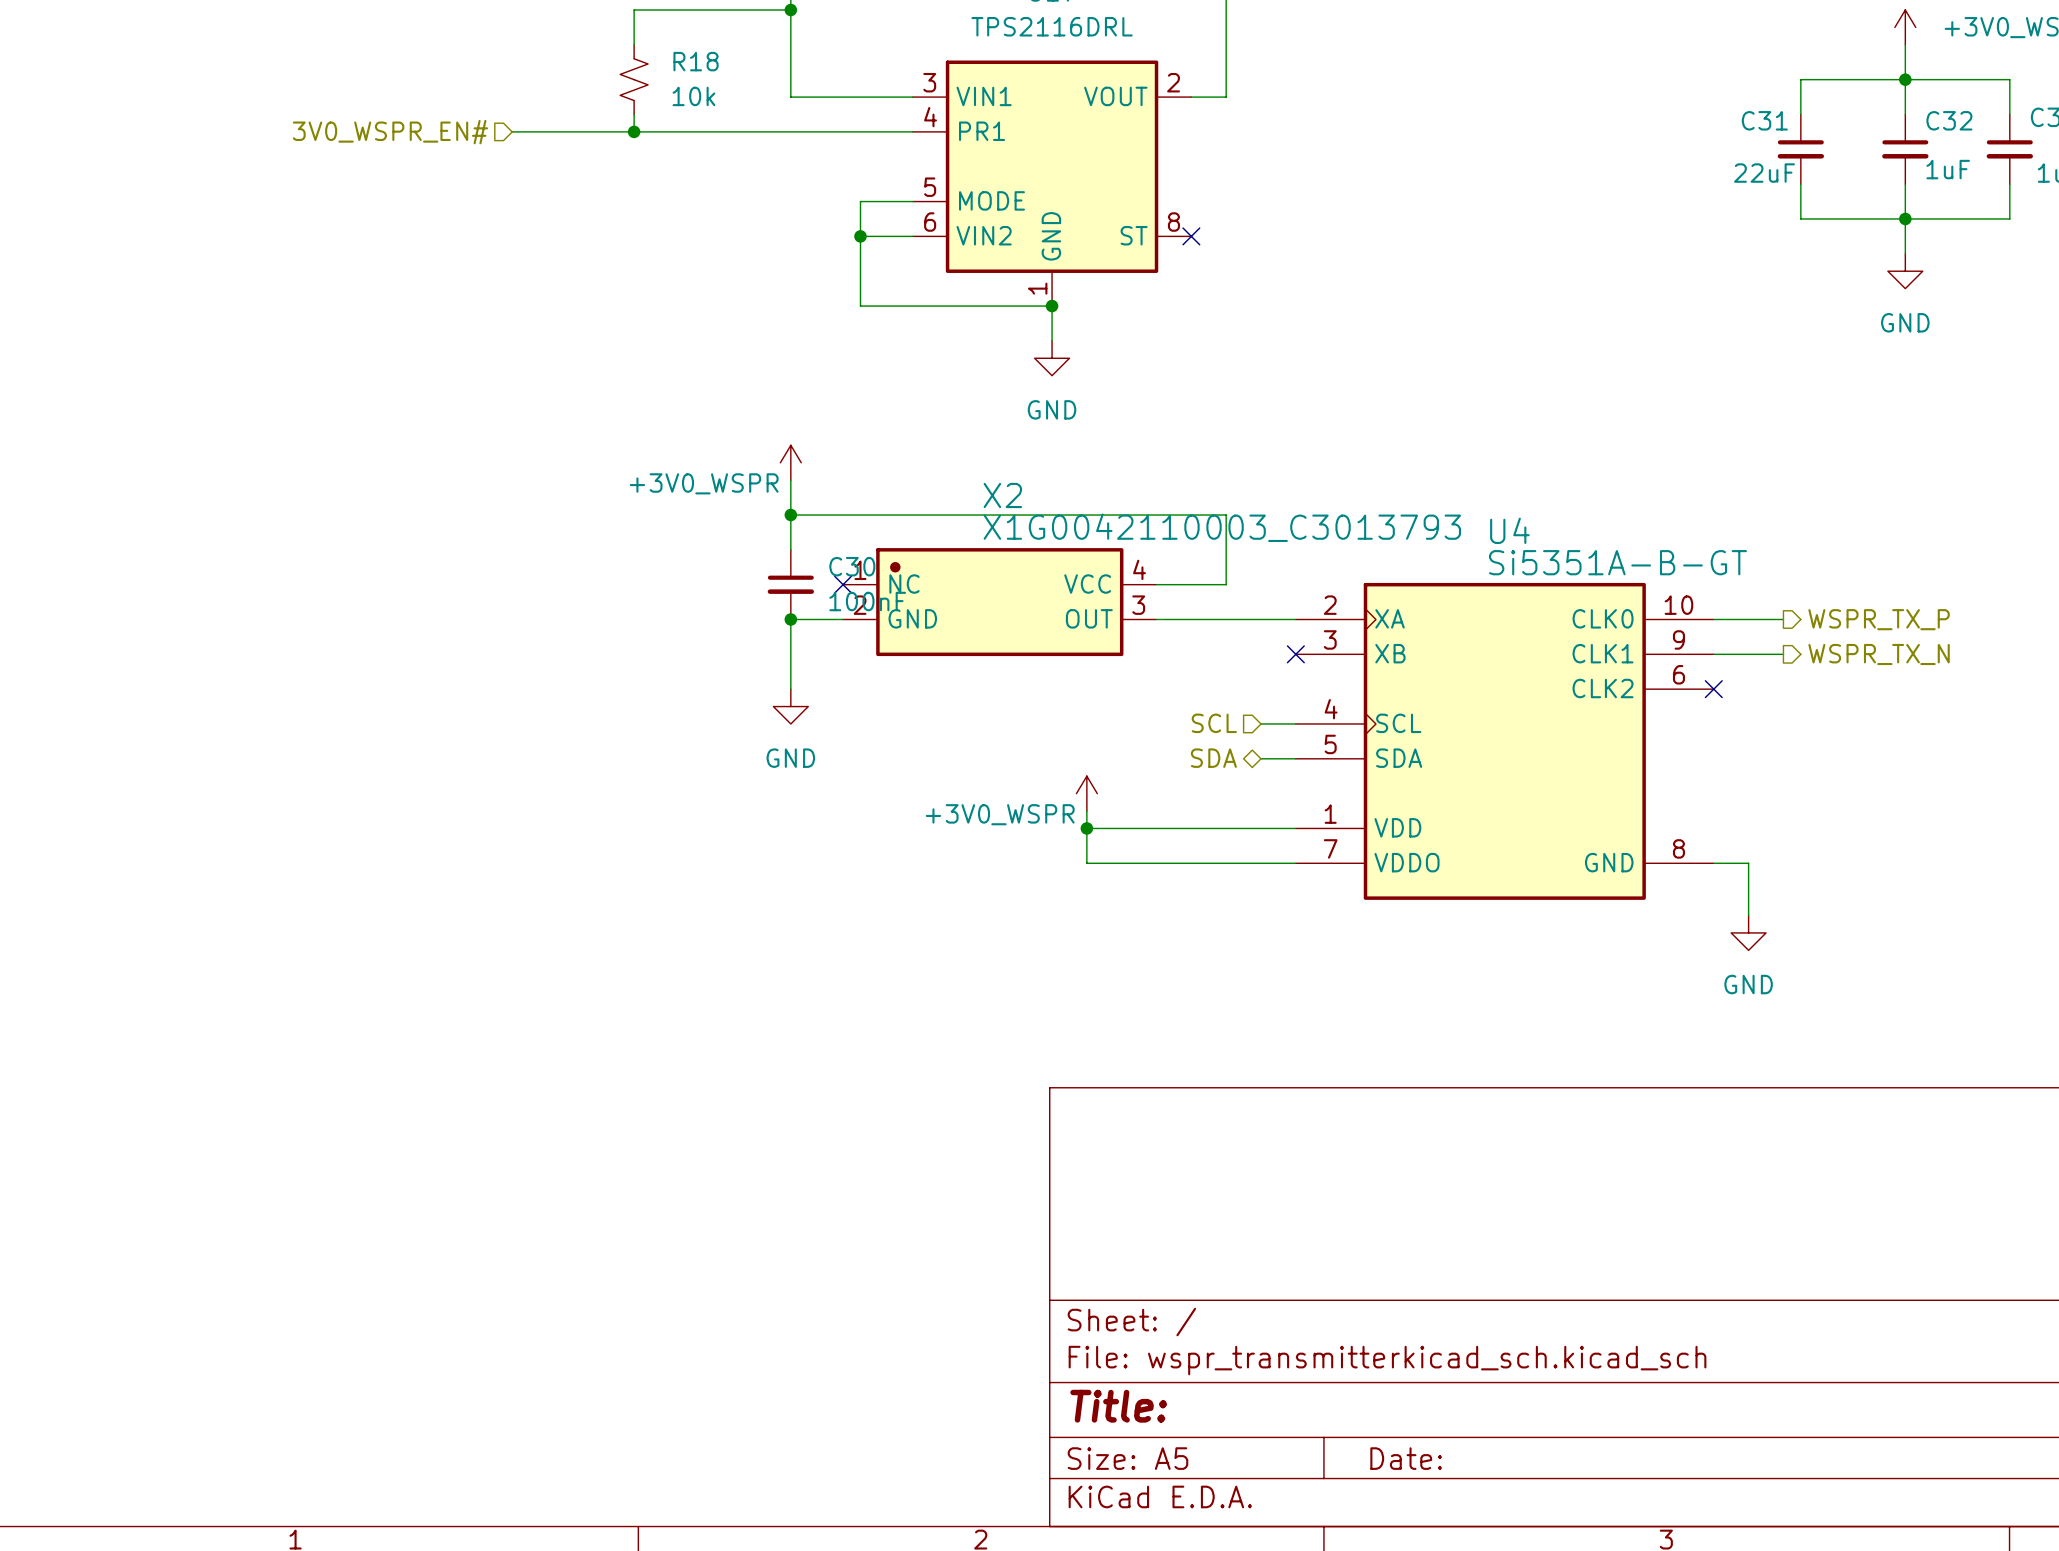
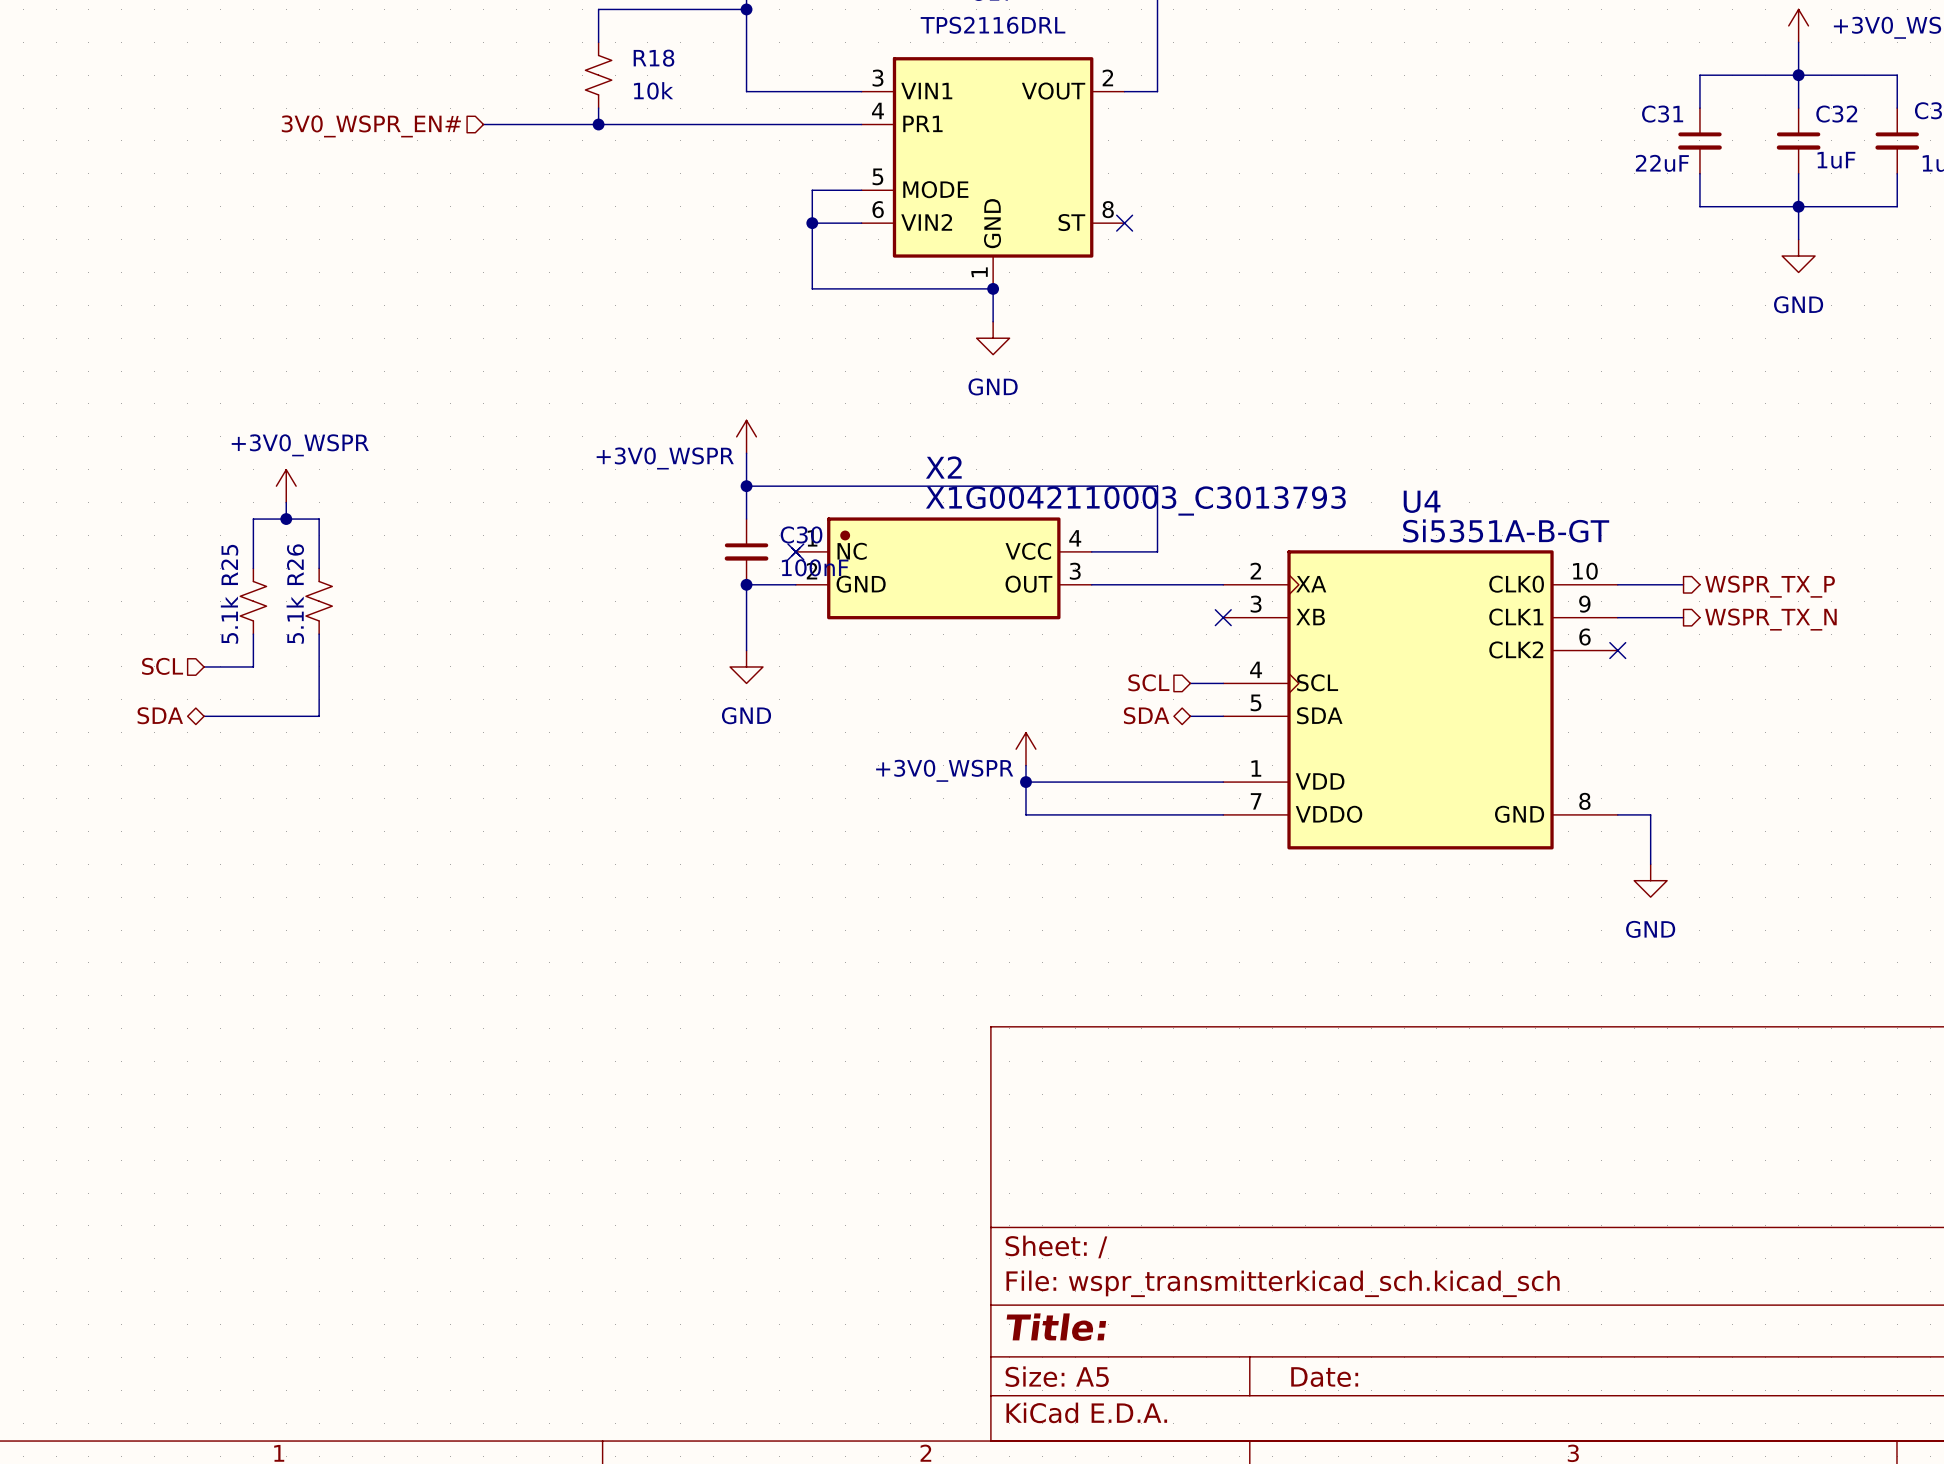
power symbol: none -> +3V0_WSPR (286, 486)
wire: none -> (286, 502) (286, 519)
X2 symbol: [843, 548, 1157, 657] -> [791, 517, 1092, 620]
junction: none -> (286, 519)
wire: none -> (253, 568) (253, 519) (319, 519) (319, 568)
R25: none -> 5.1k (253, 601)
R26: none -> 5.1k (319, 601)
wire: none -> (253, 634) (253, 666) (204, 666)
wire: none -> (319, 634) (319, 716) (204, 716)
hierarchical label: none -> SCL (162, 666)
hierarchical label: none -> SDA (160, 715)

